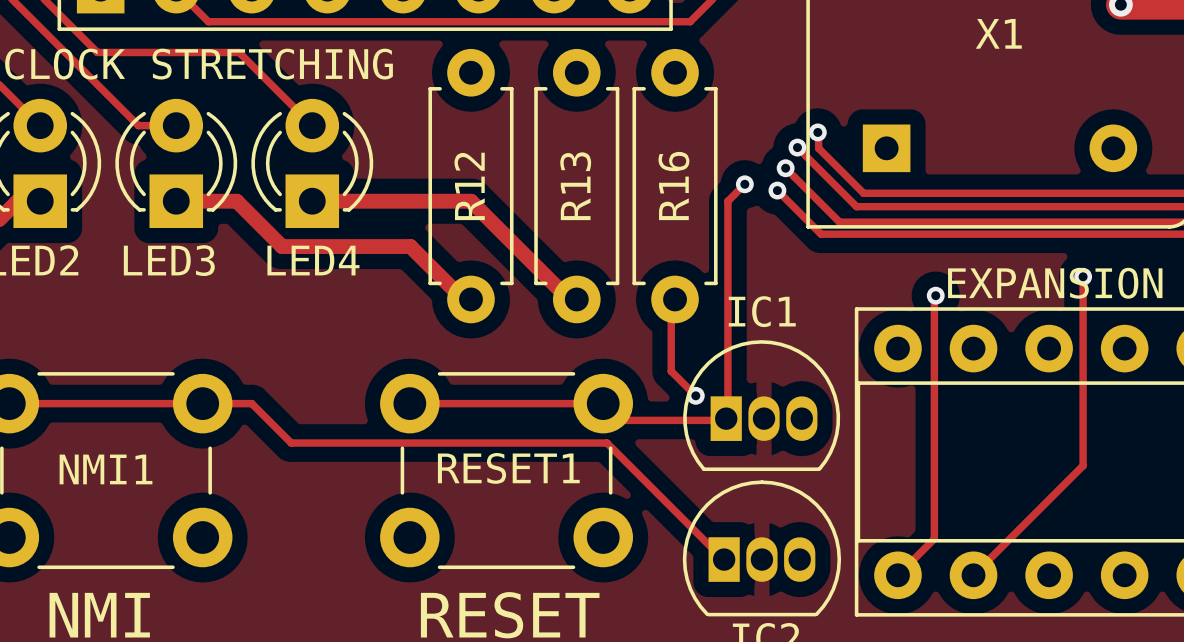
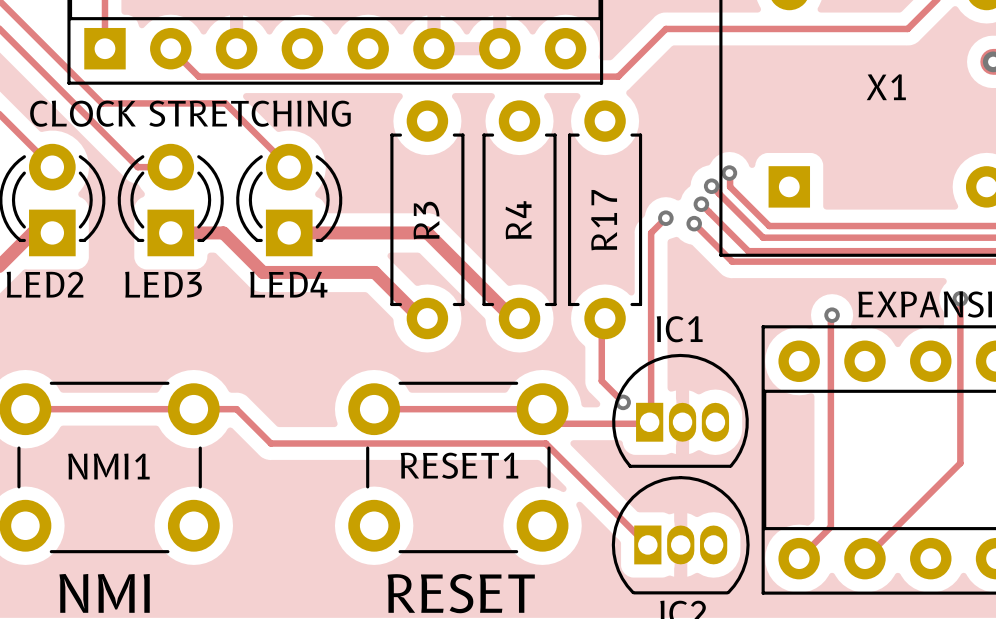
R12 name: R12 (469, 186) -> R3 (426, 220)
R13 name: R13 (575, 186) -> R4 (518, 220)
R16 name: R16 (673, 186) -> R17 (604, 220)

